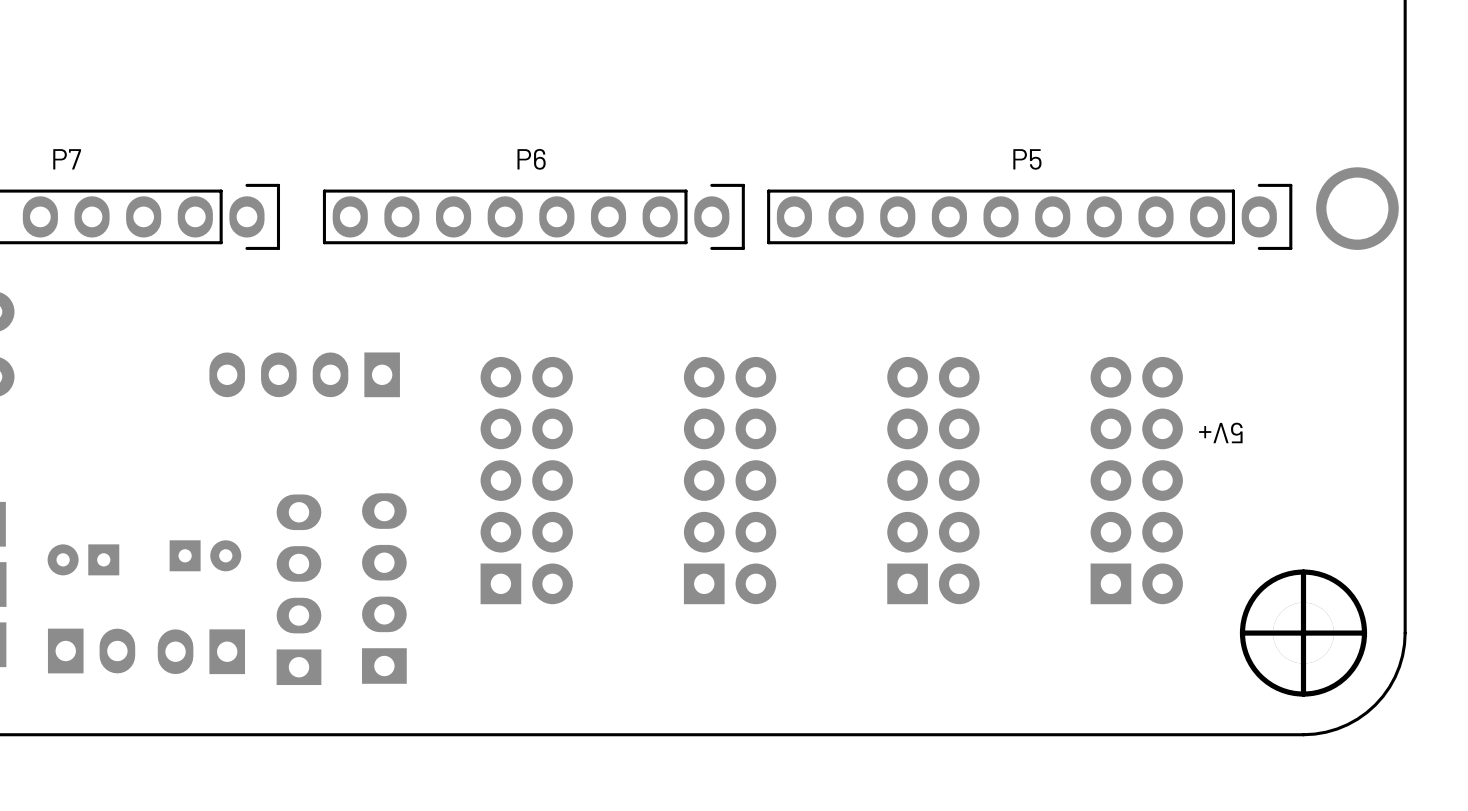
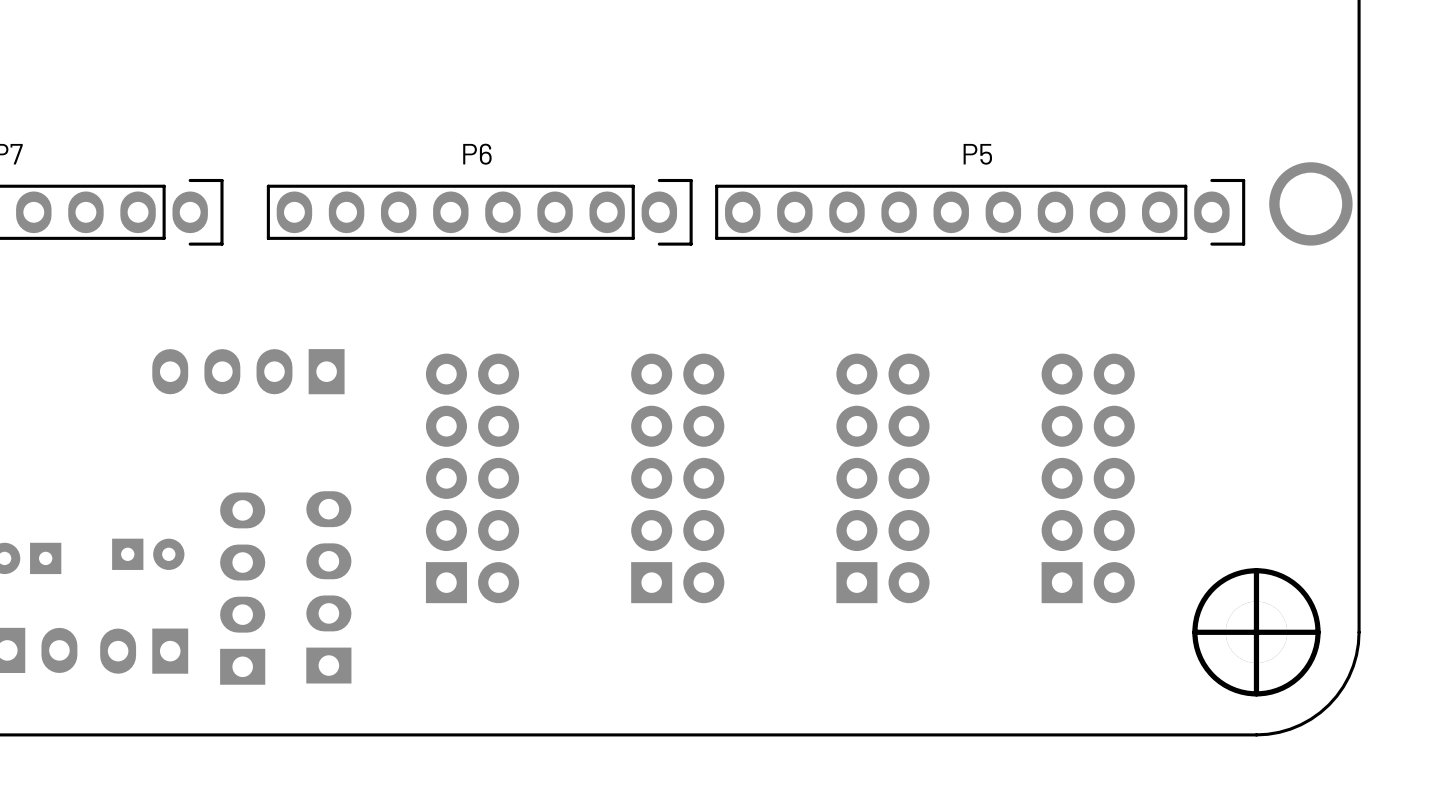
text: 5V+ (1220, 432) -> none

